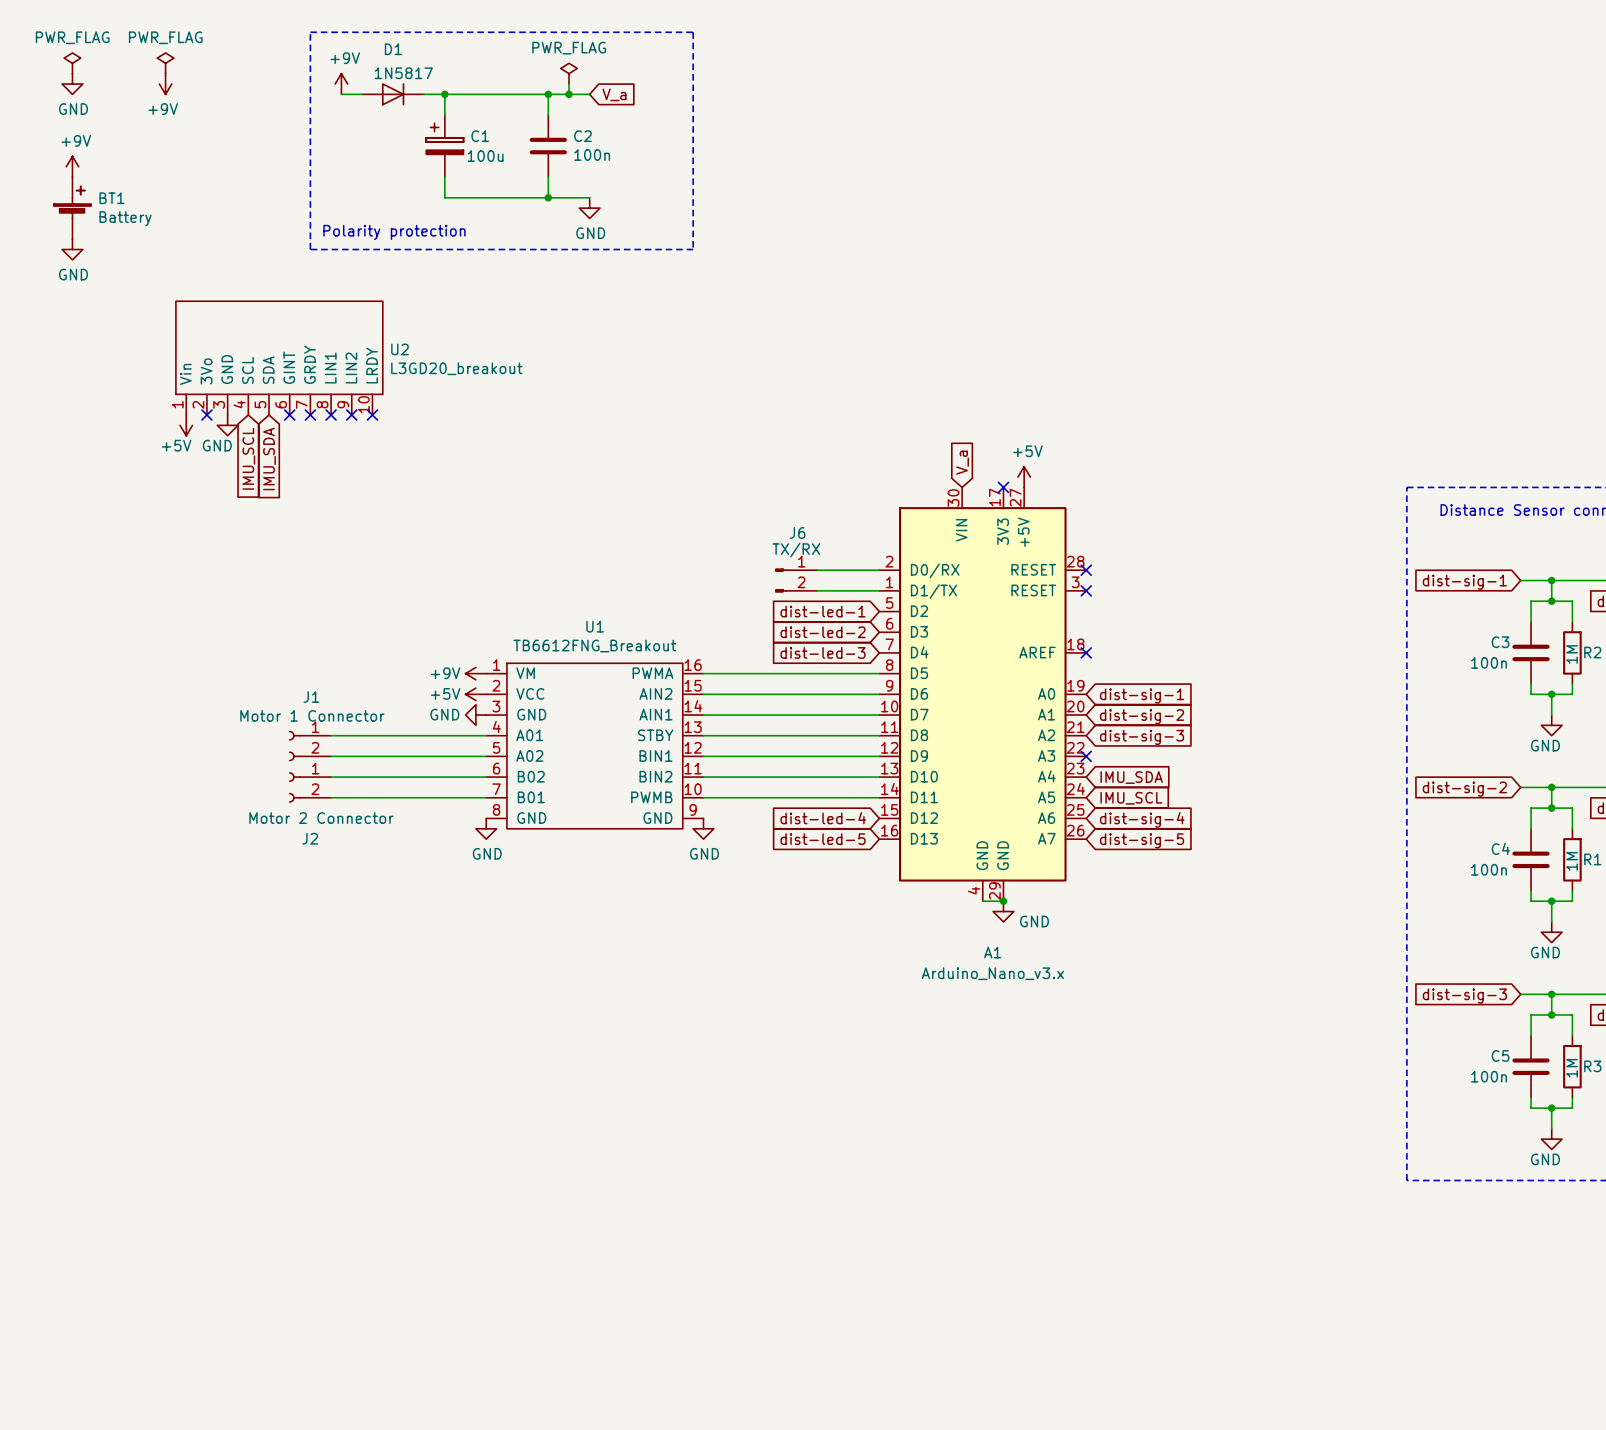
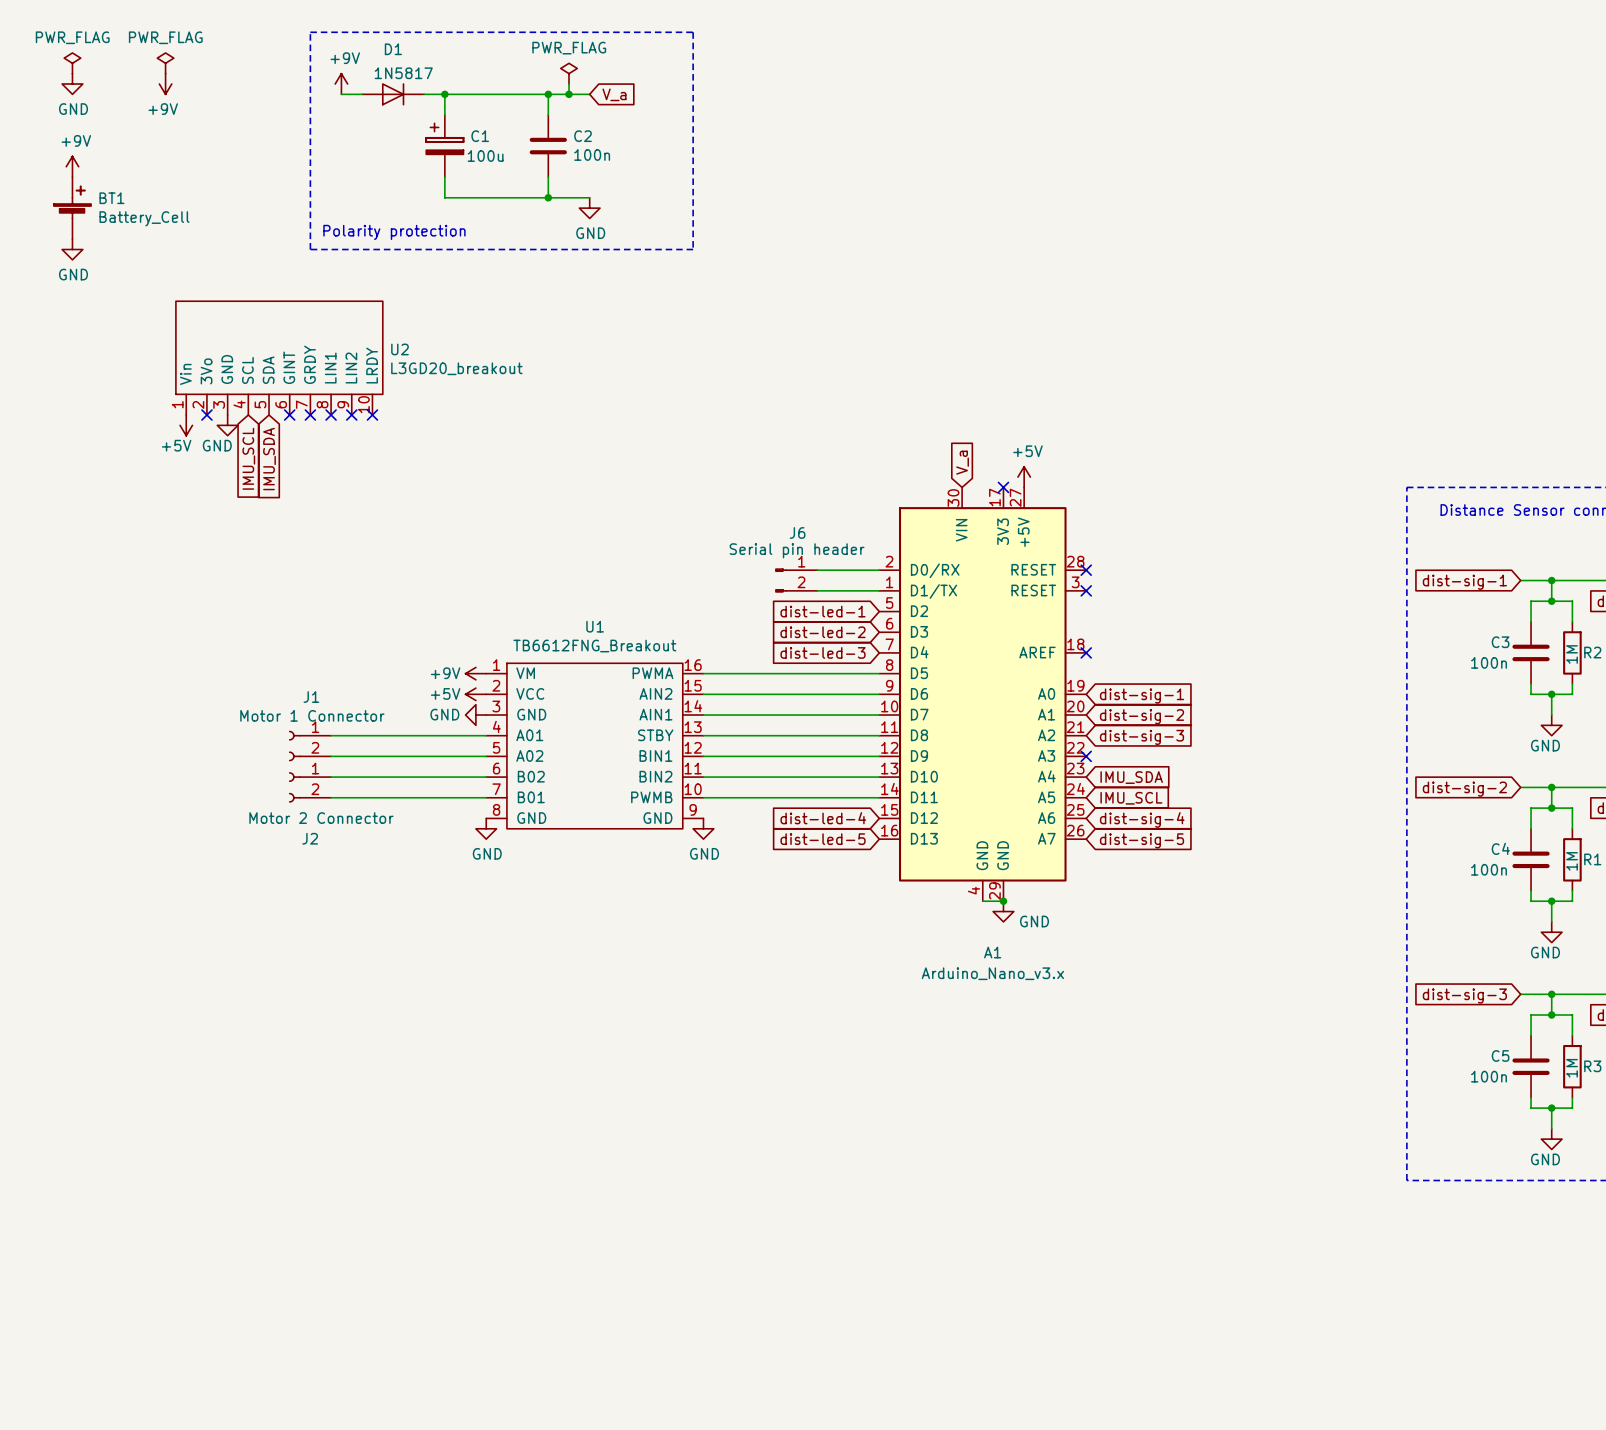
BT1 value: Battery (125, 218) -> Battery_Cell (144, 218)
J6 value: TX/RX (796, 550) -> Serial pin header (797, 550)

